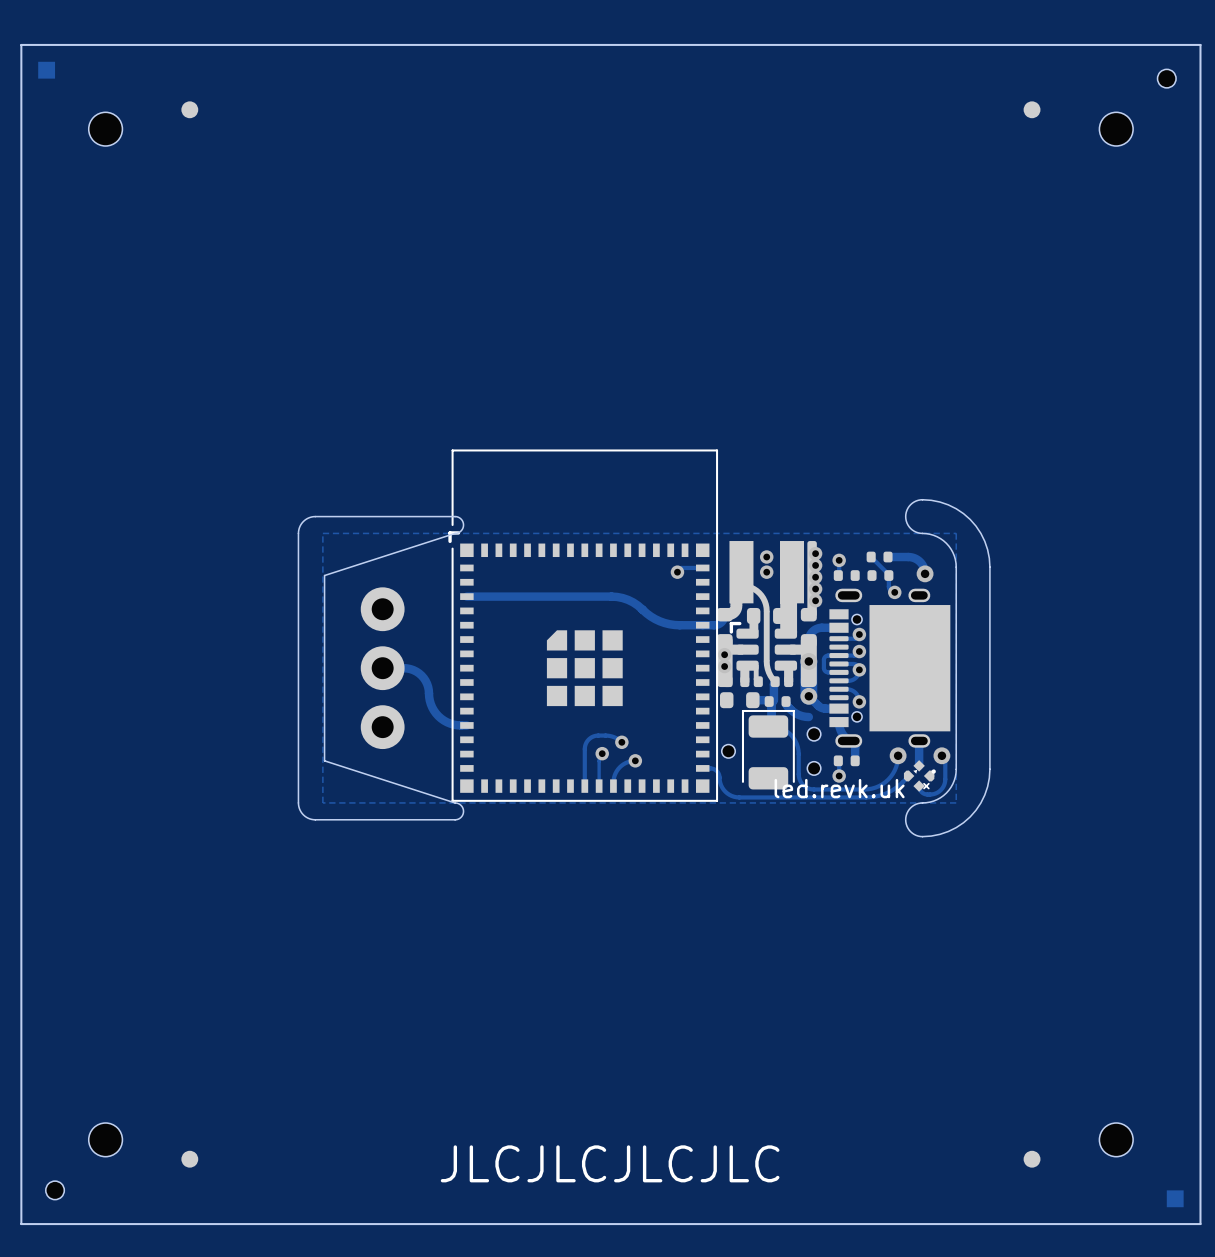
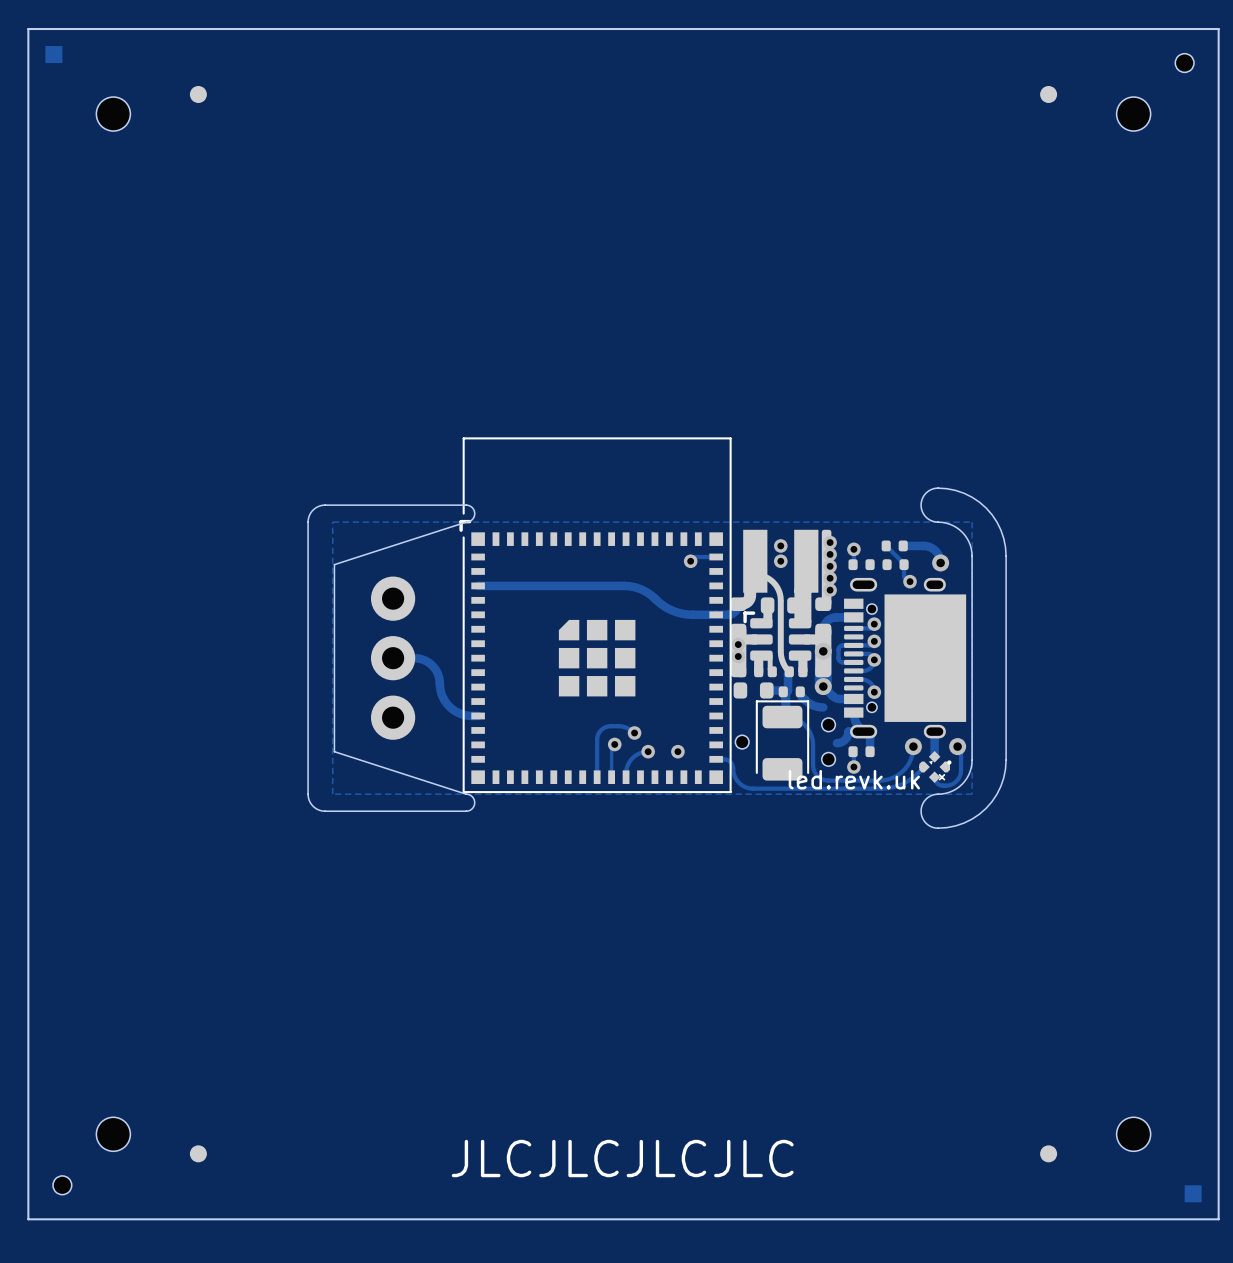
track: none -> (863, 731) (848, 731) (845, 739) (836, 743)
via: none -> (677, 751)

